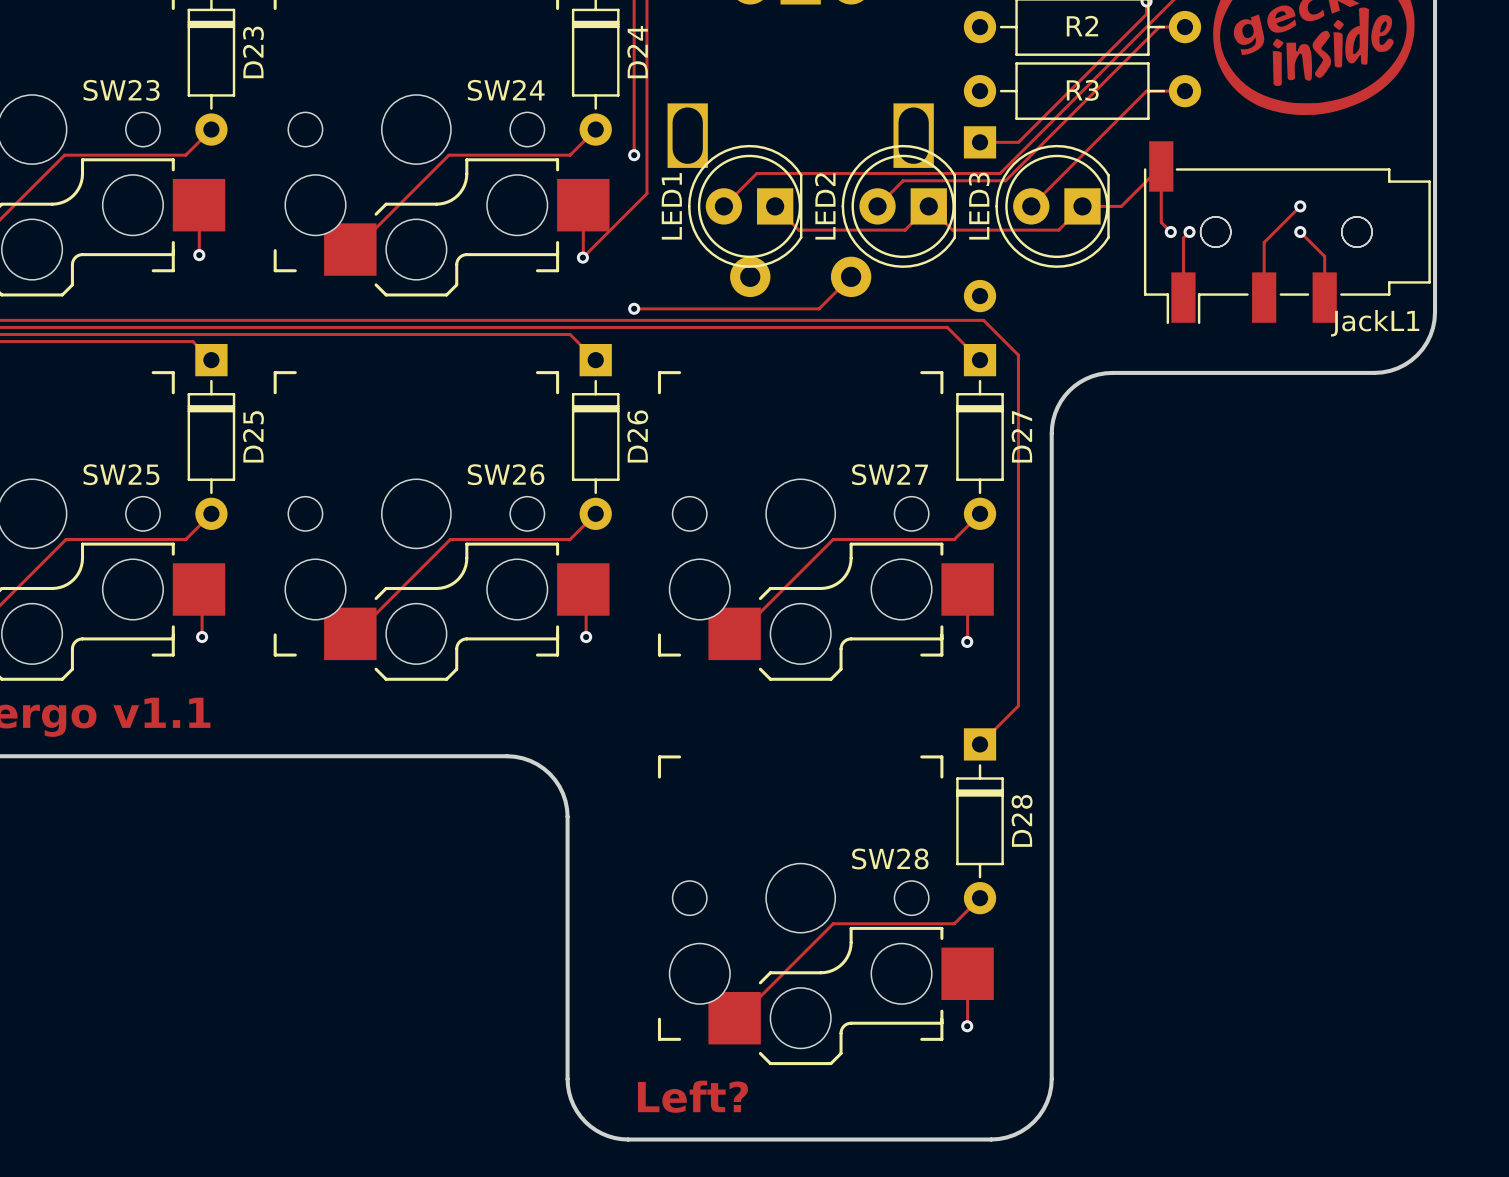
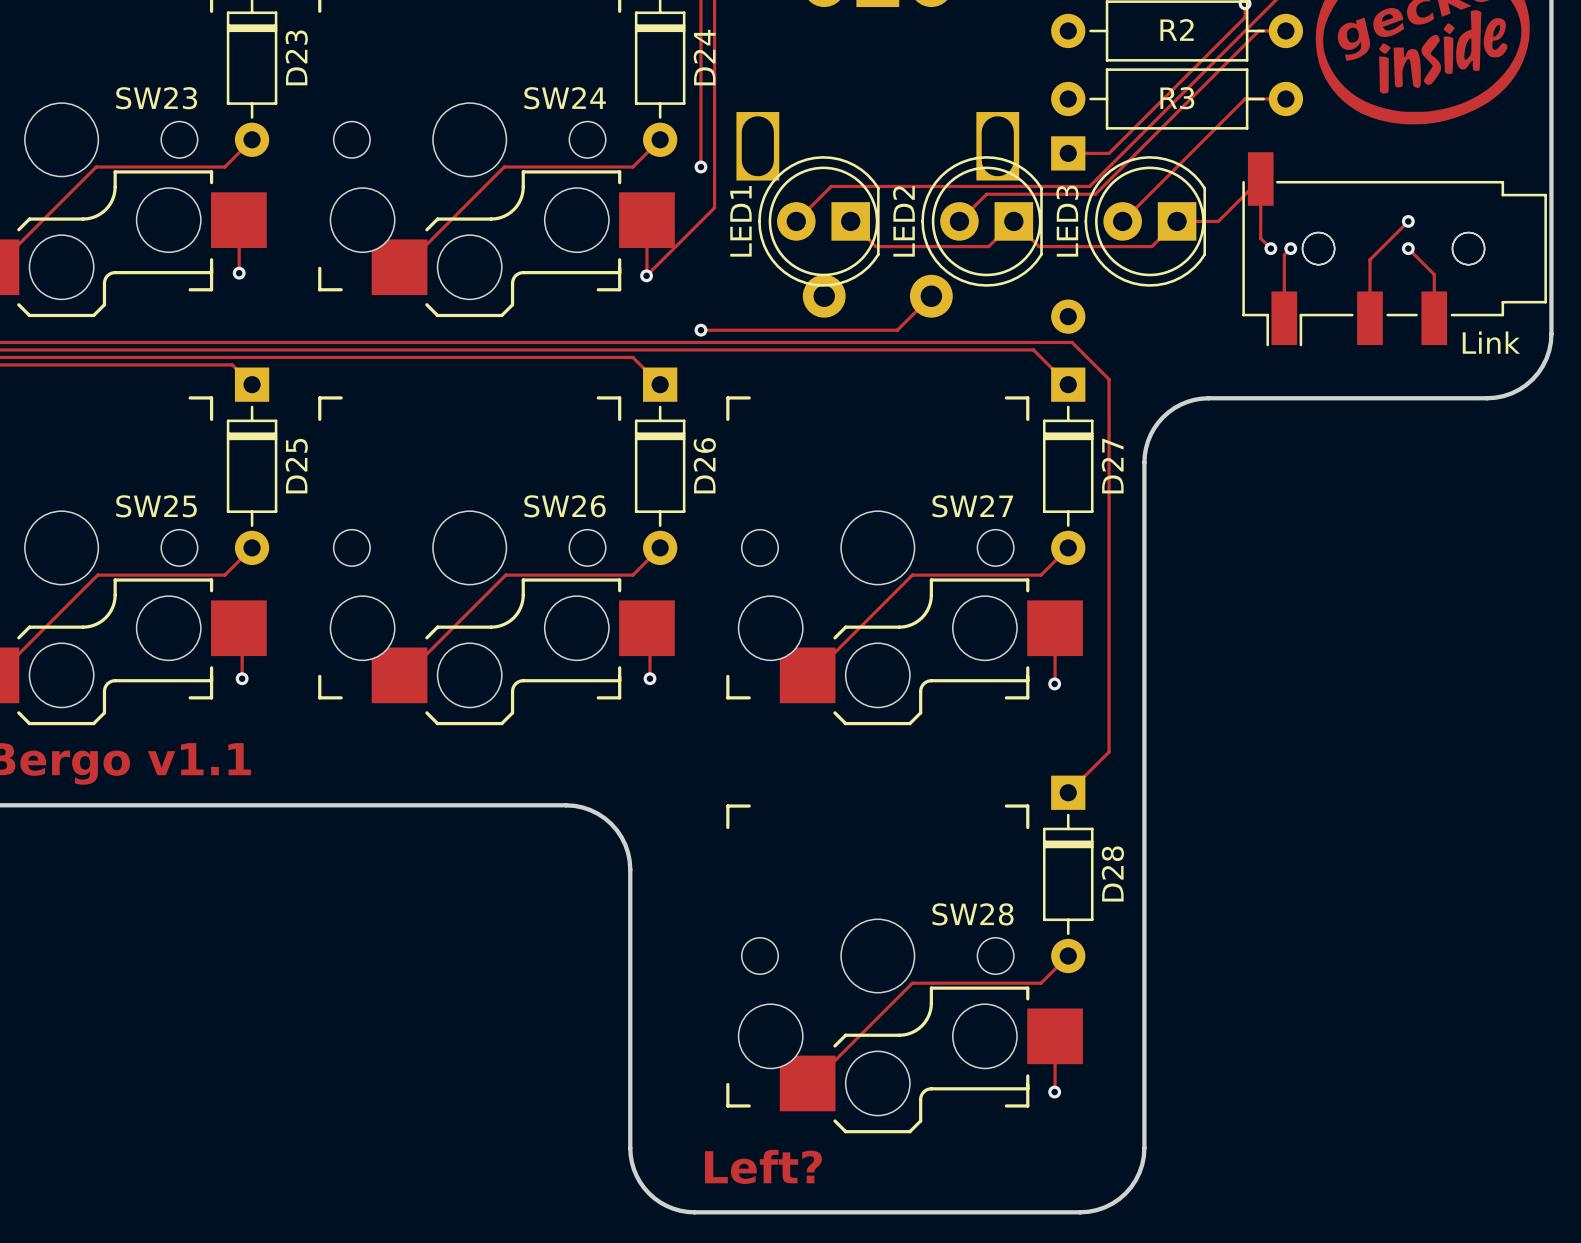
JackL1 name: JackL1 (1375, 323) -> Link (1491, 342)

